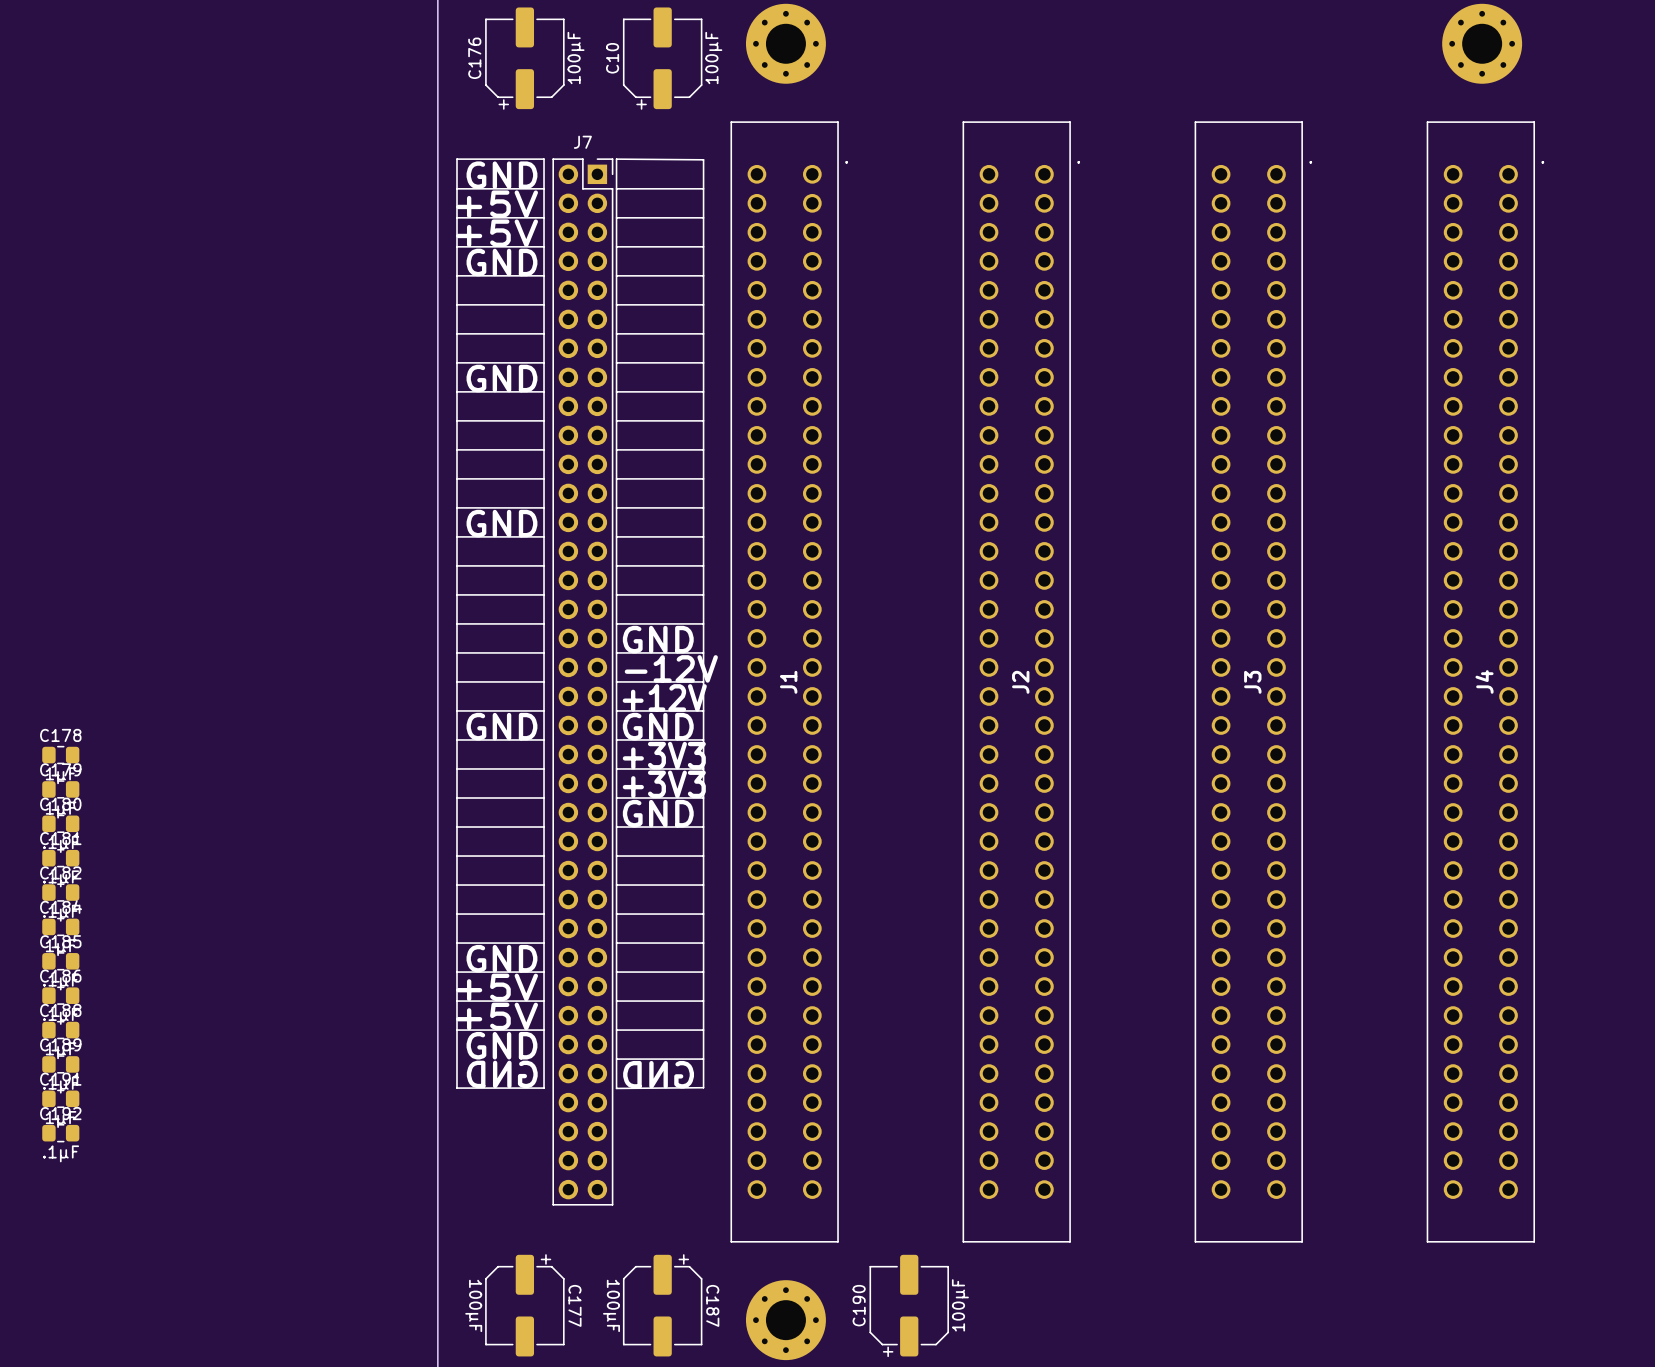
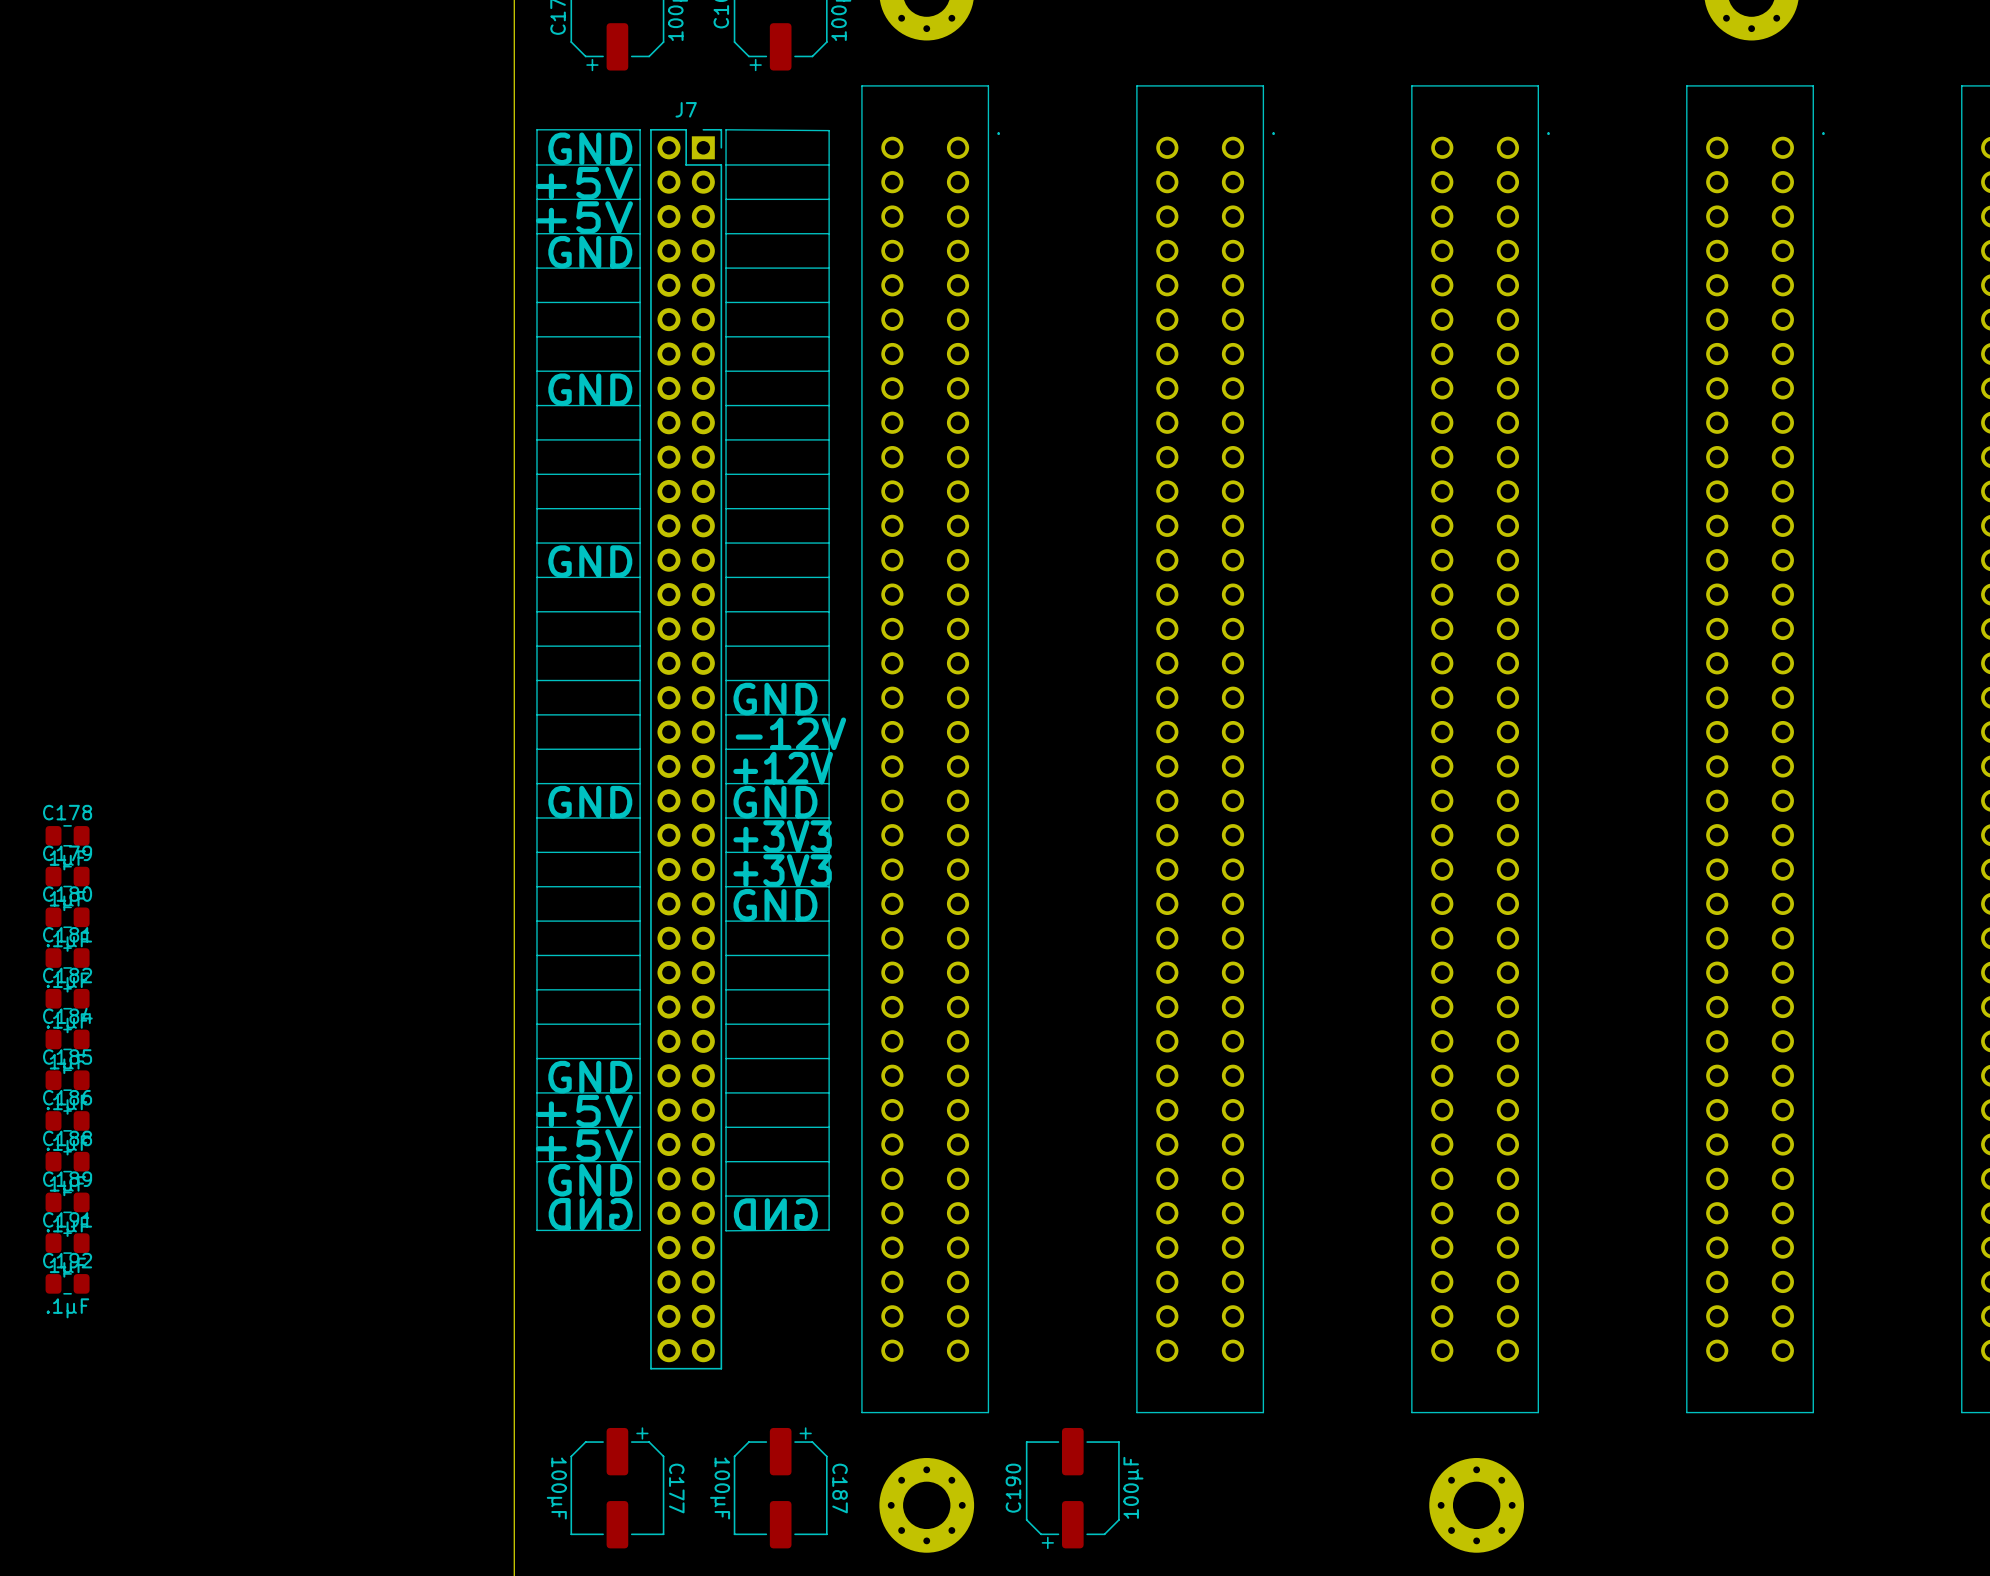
J4 name: J4 (1484, 681) -> none
J1 name: J1 (788, 682) -> none
J2 name: J2 (1020, 682) -> none
J3 name: J3 (1252, 682) -> none
part: none -> (1476, 1505)

